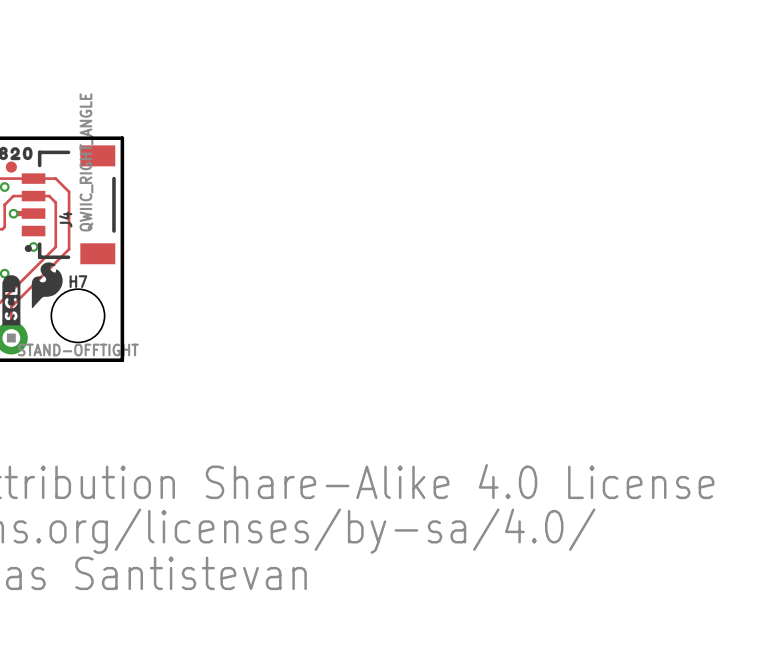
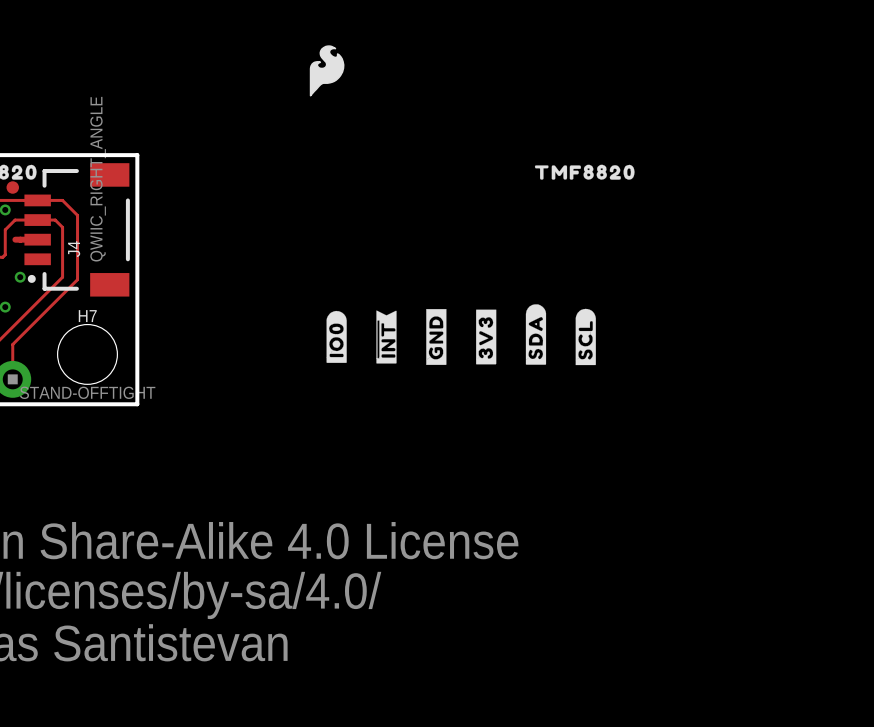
drawing: none -> [534, 164, 635, 180]
via: (13, 213) -> none
via: none -> (20, 277)
via: (33, 246) -> none
drawing: none -> [525, 304, 547, 365]
drawing: [2, 275, 21, 326] -> none
drawing: none -> [426, 309, 447, 365]
drawing: none -> [476, 309, 497, 365]
drawing: none -> [575, 308, 596, 366]
drawing: none -> [376, 310, 397, 364]
drawing: none -> [326, 310, 347, 363]
drawing position: (47, 285) -> (327, 70)

